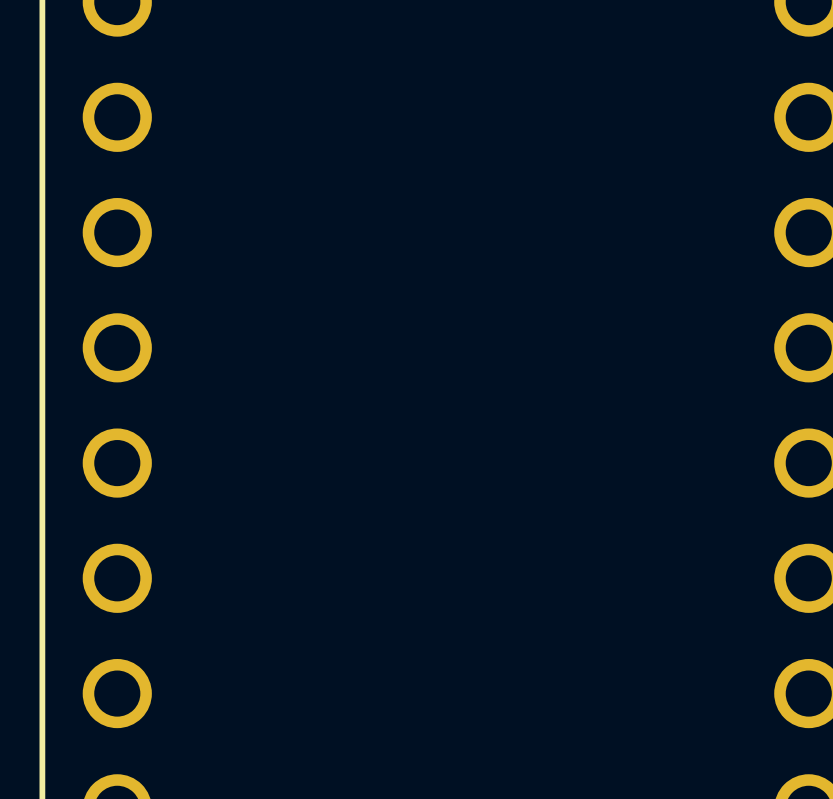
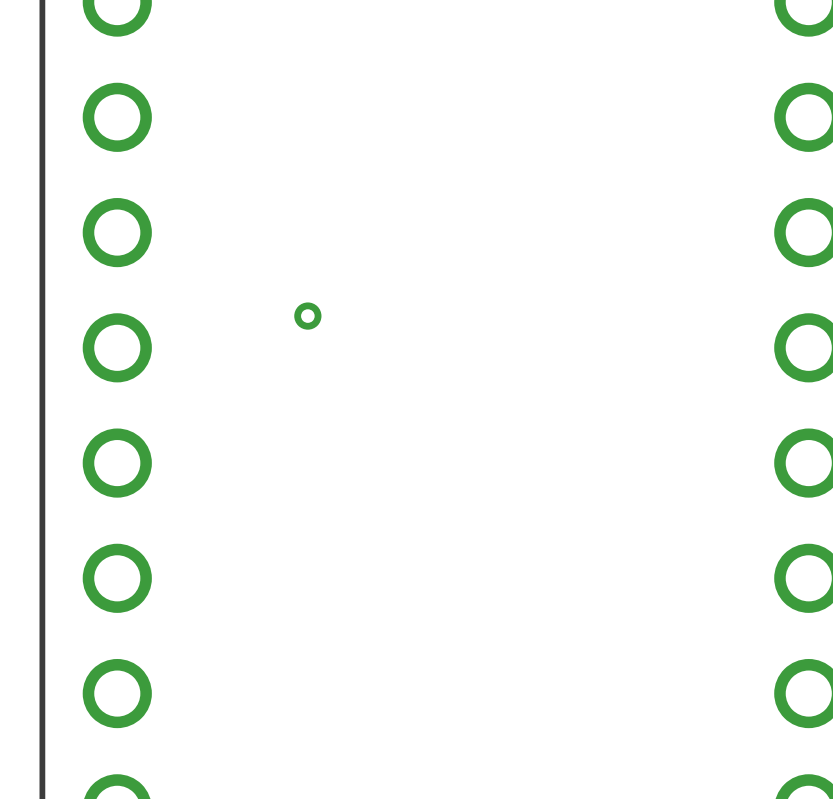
via: none -> (307, 316)

